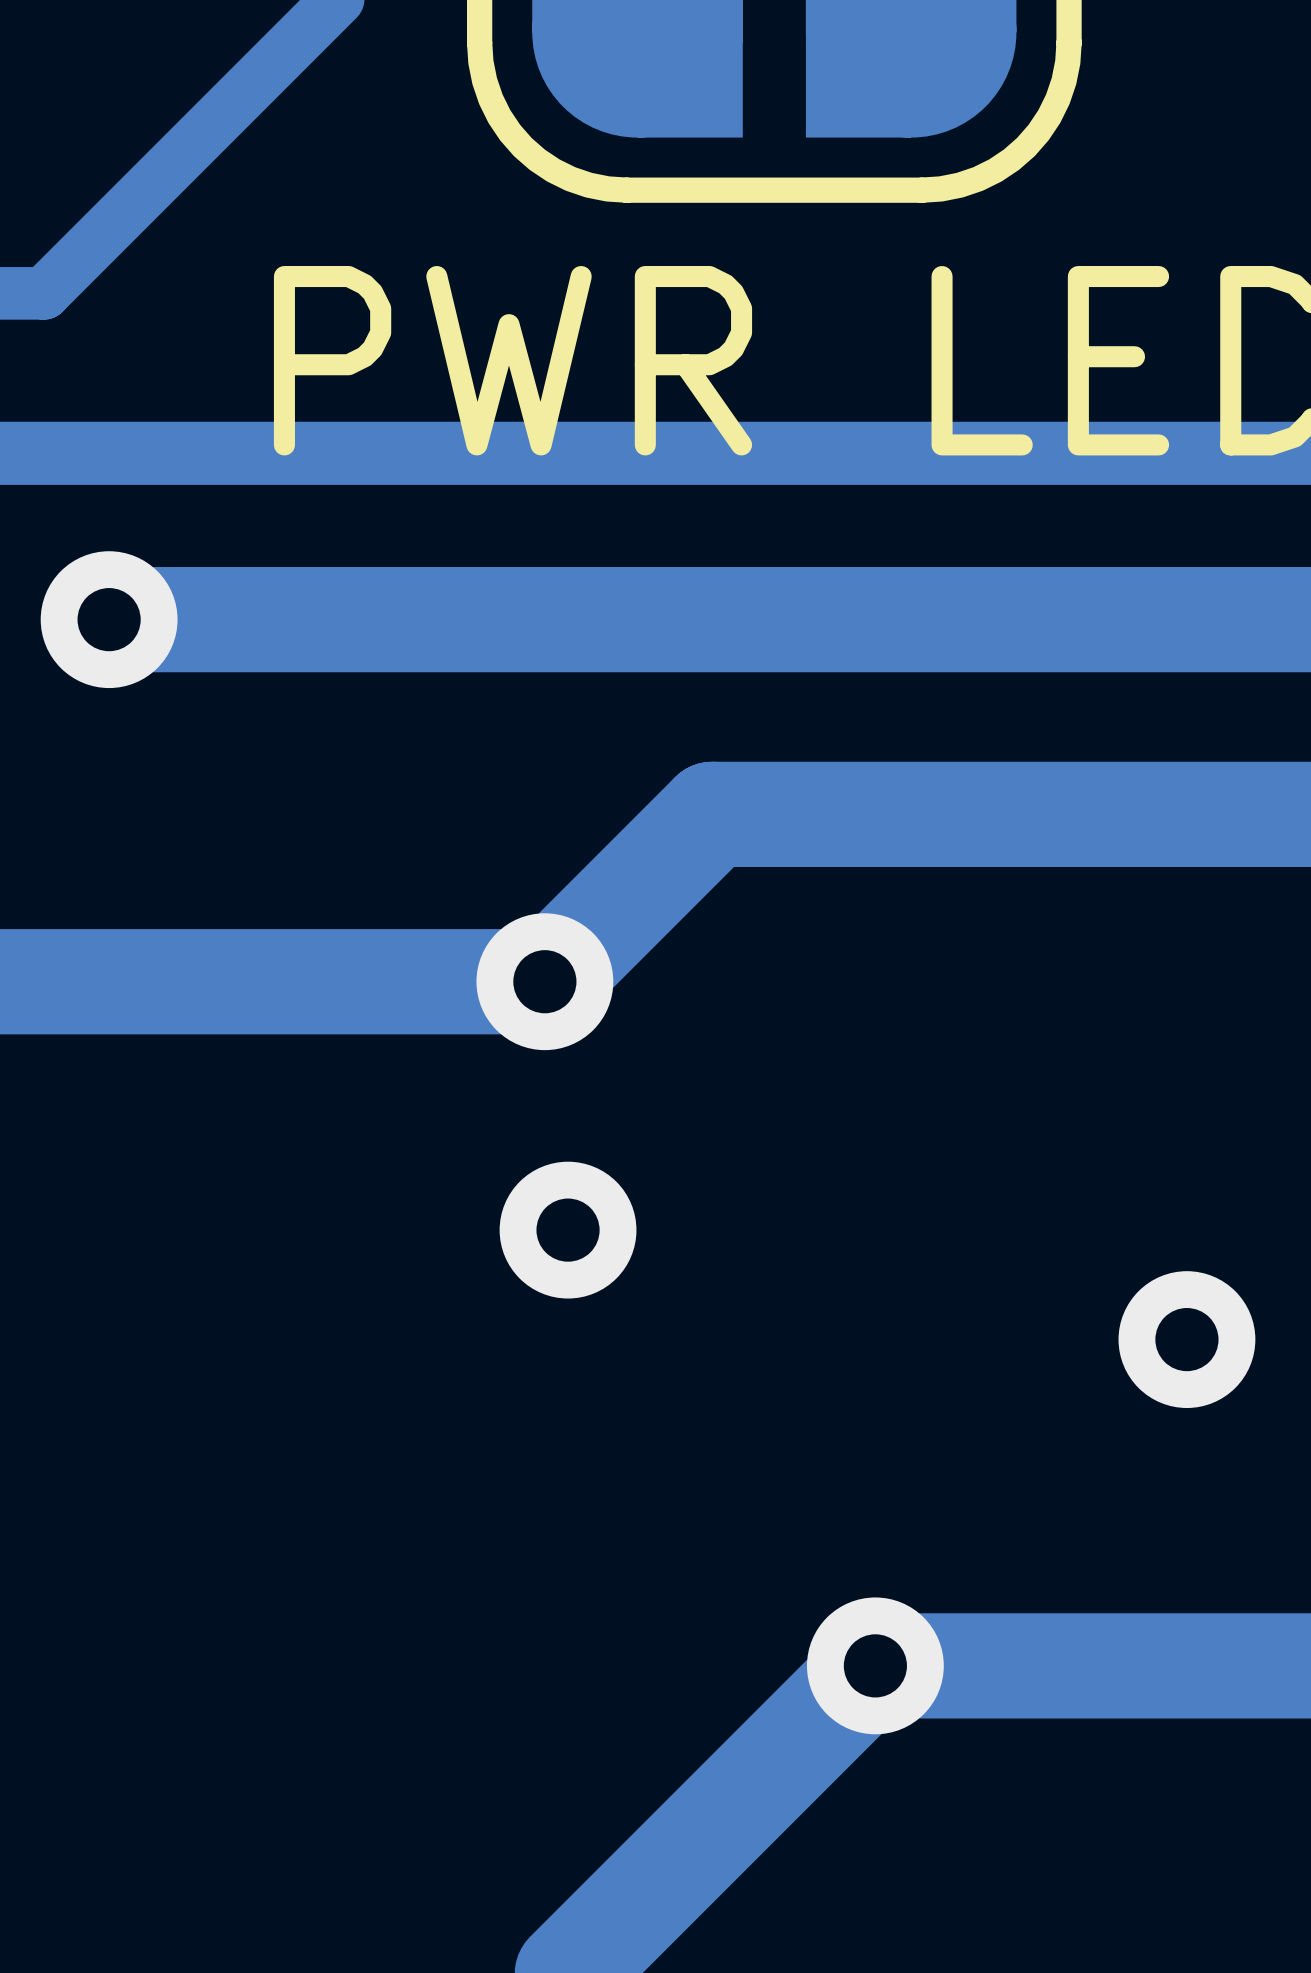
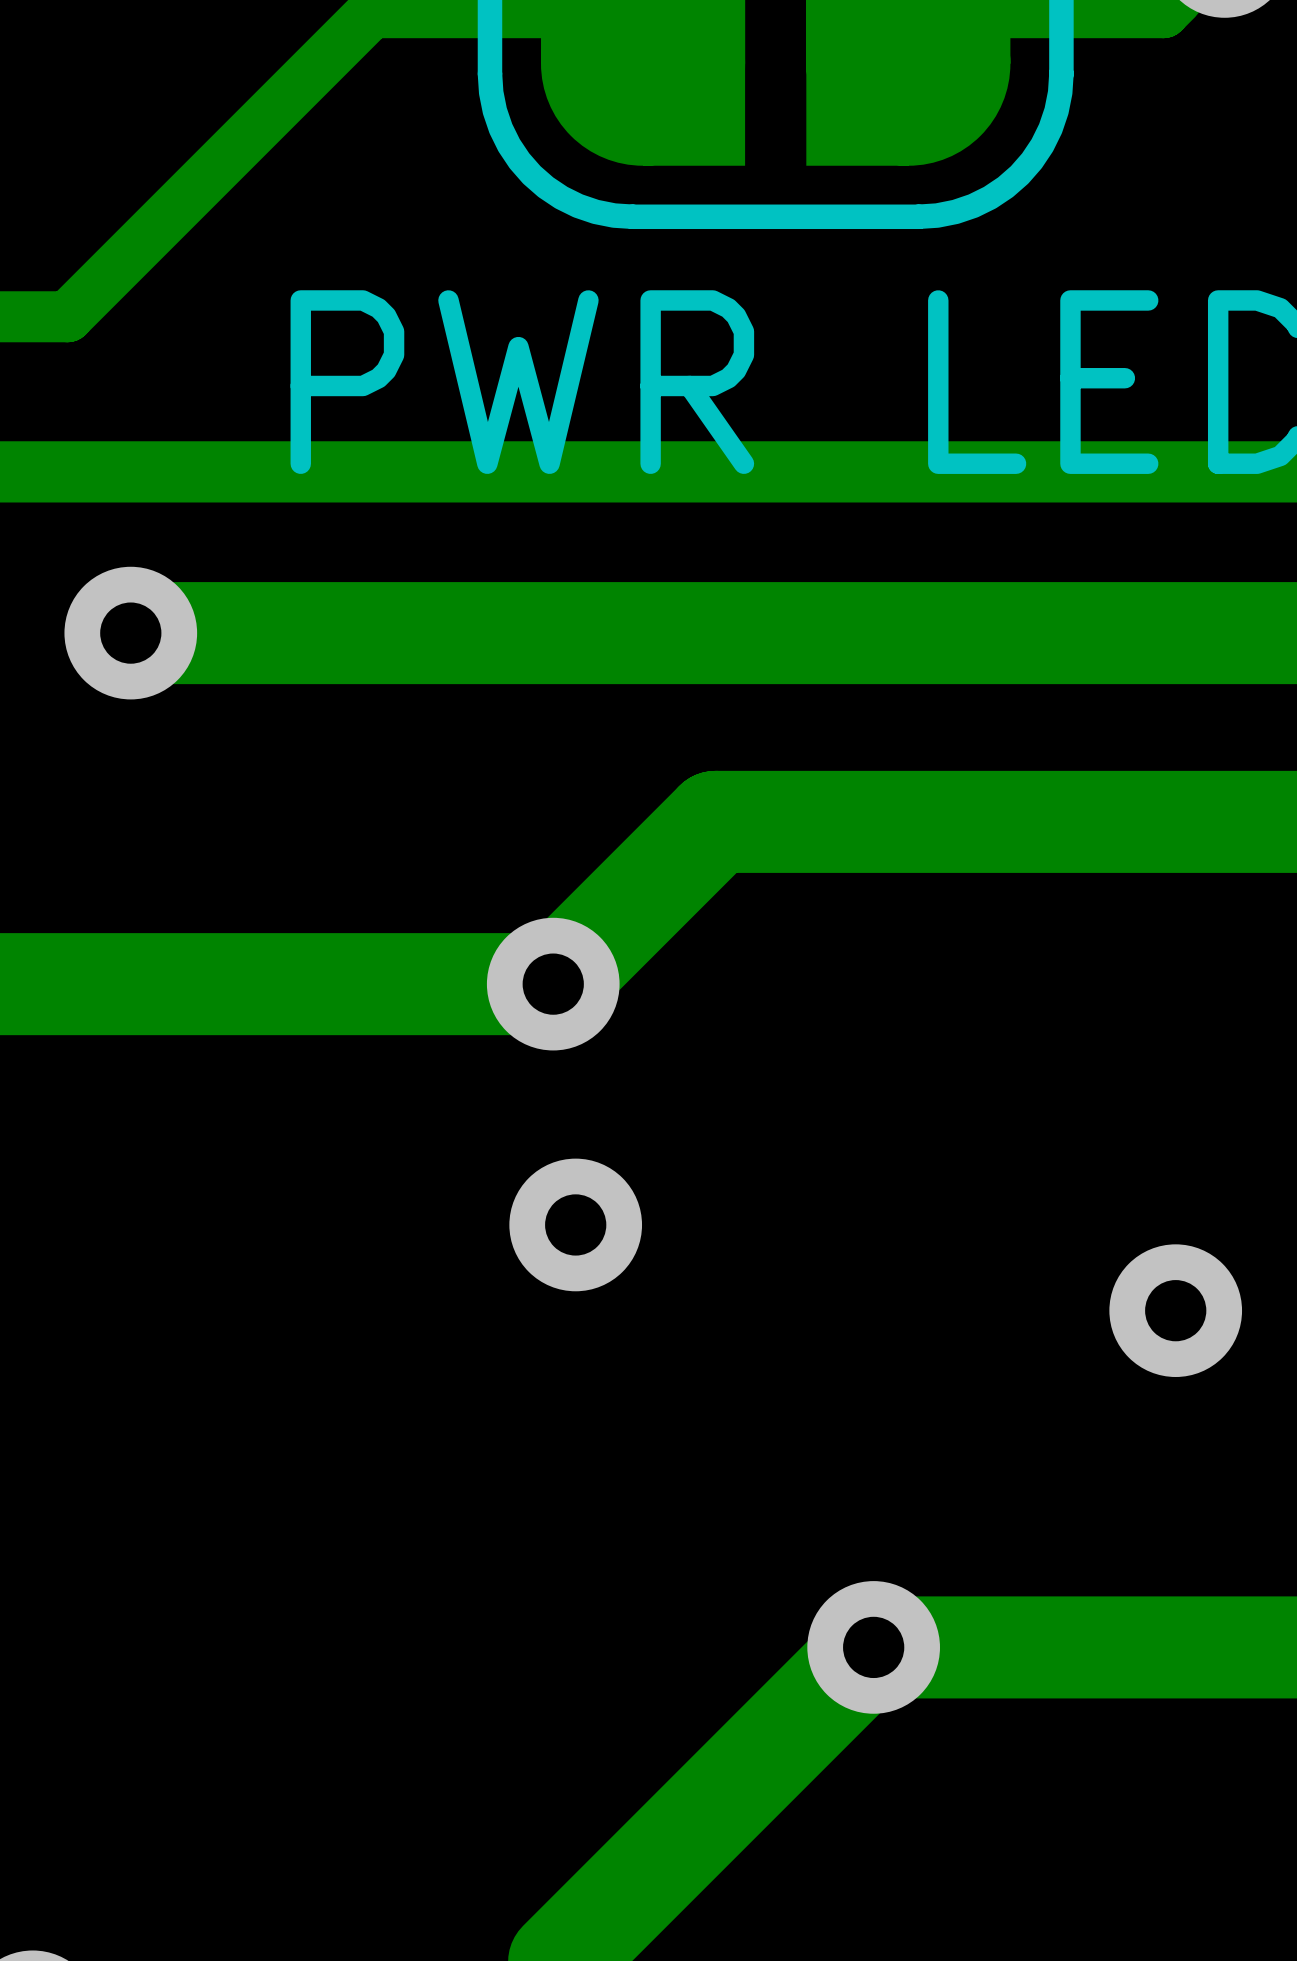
via position: (1186, 1339) -> (1175, 1310)

